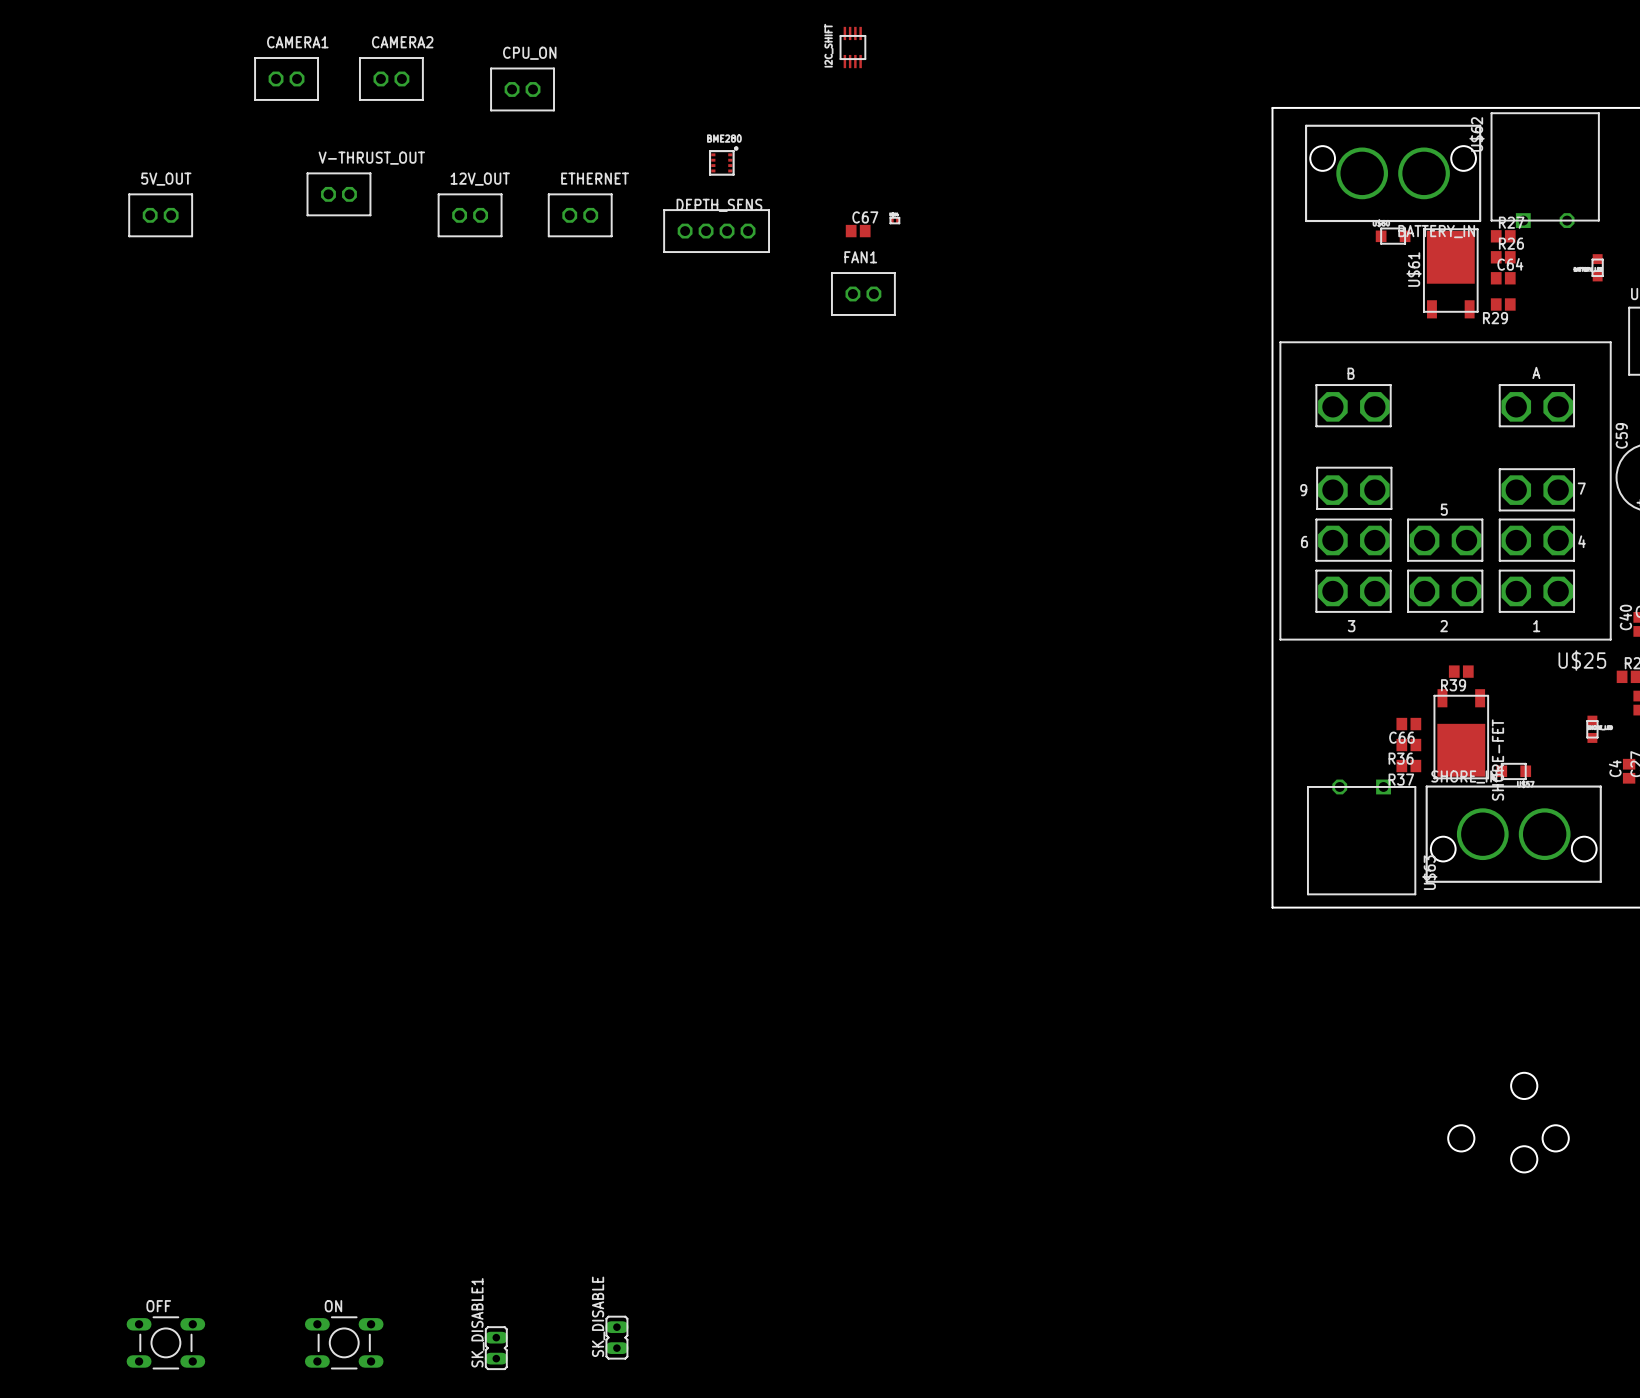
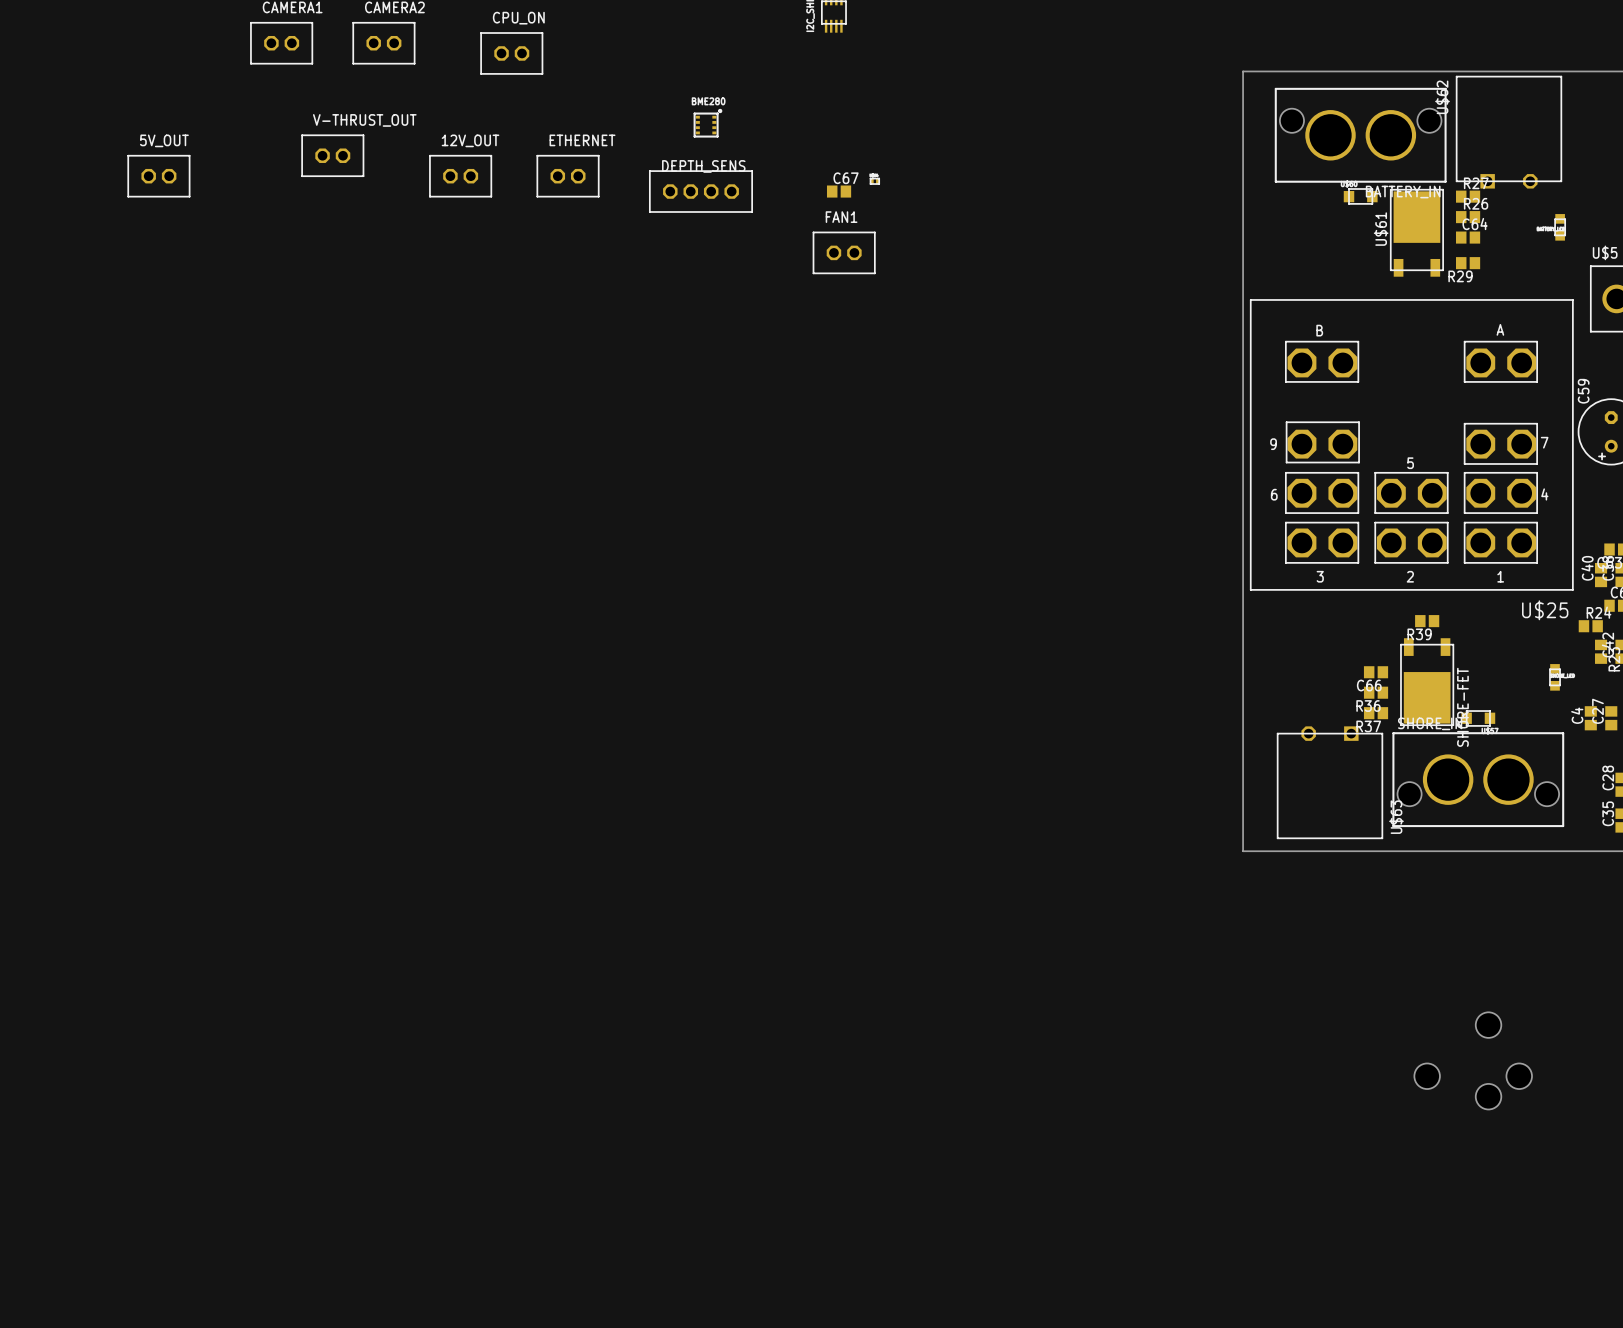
SK_DISABLE: (616, 1337) -> none
OFF: (165, 1342) -> none
ON: (344, 1342) -> none
SK_DISABLE1: (496, 1348) -> none

